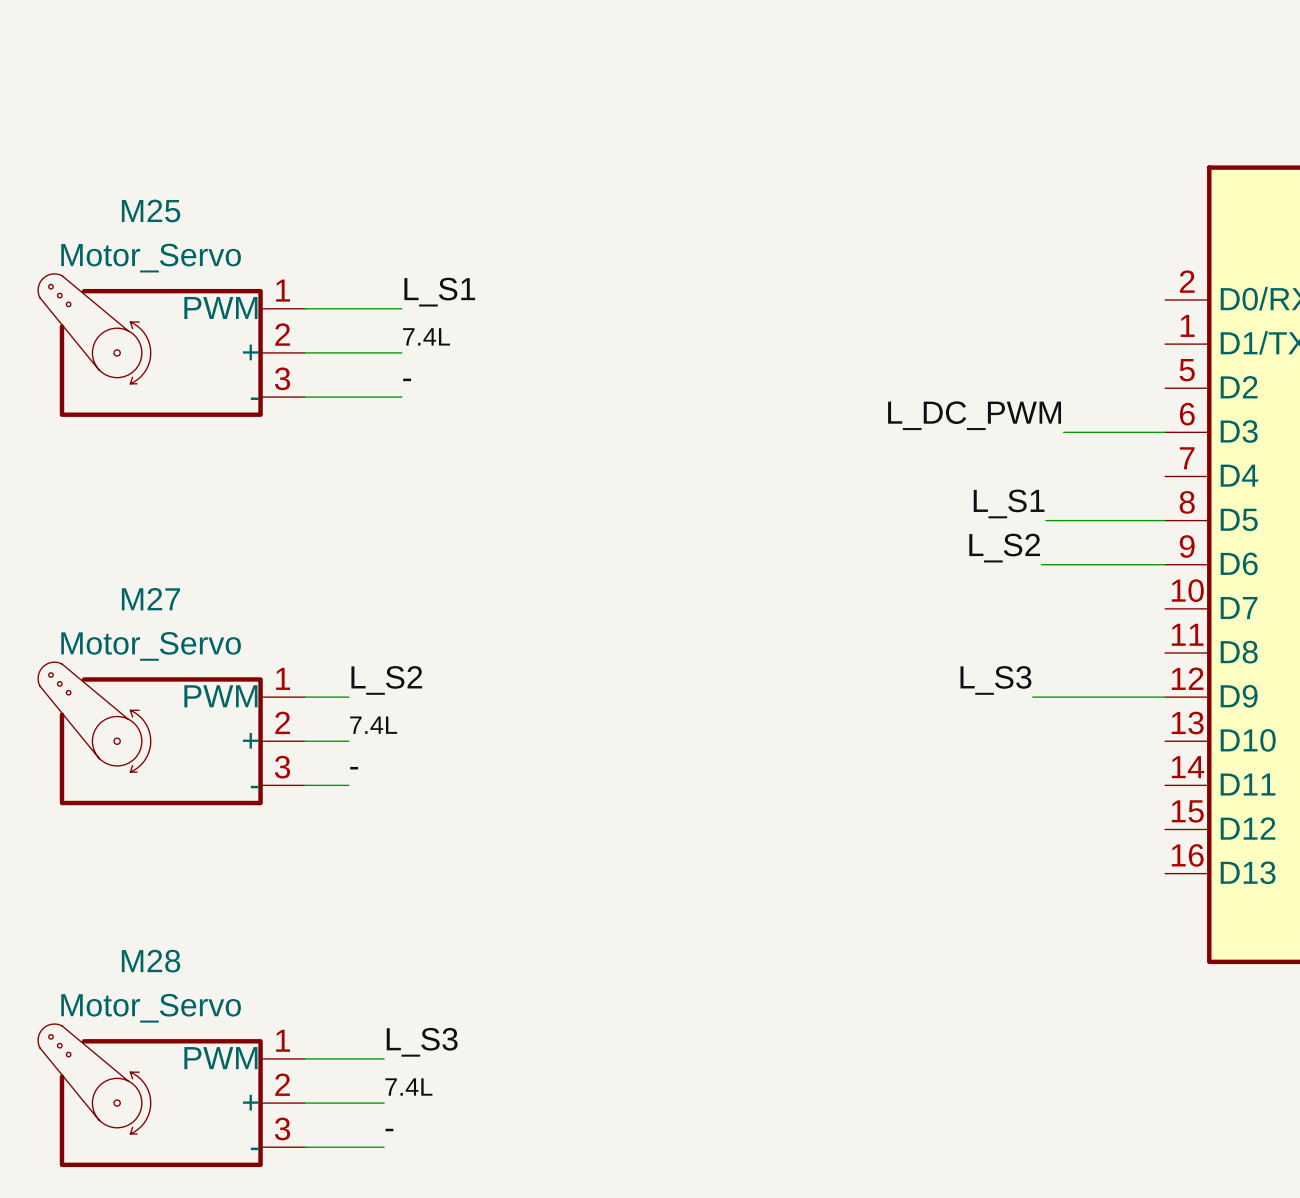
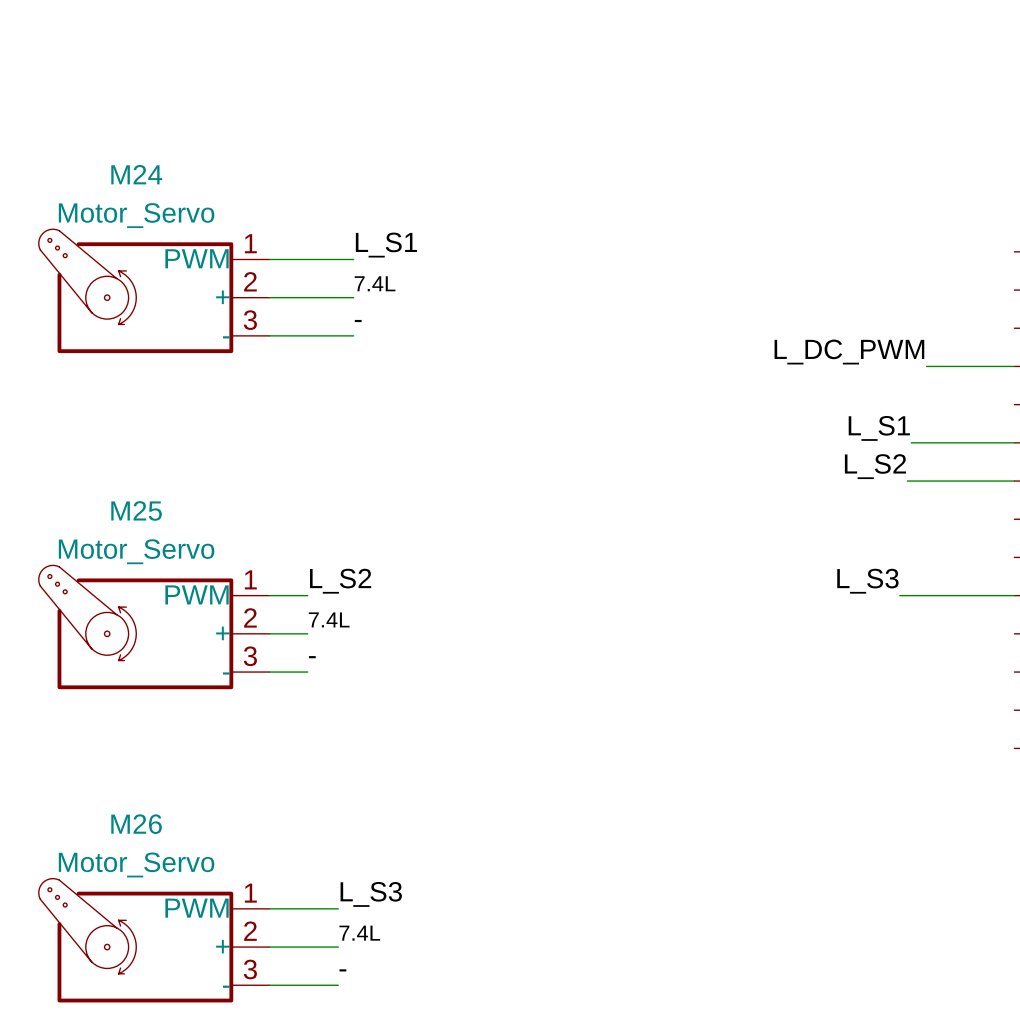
M25 name: M25 (151, 210) -> M24 (136, 174)
M27 name: M27 (150, 599) -> M25 (136, 510)
M28 name: M28 (151, 961) -> M26 (136, 824)

